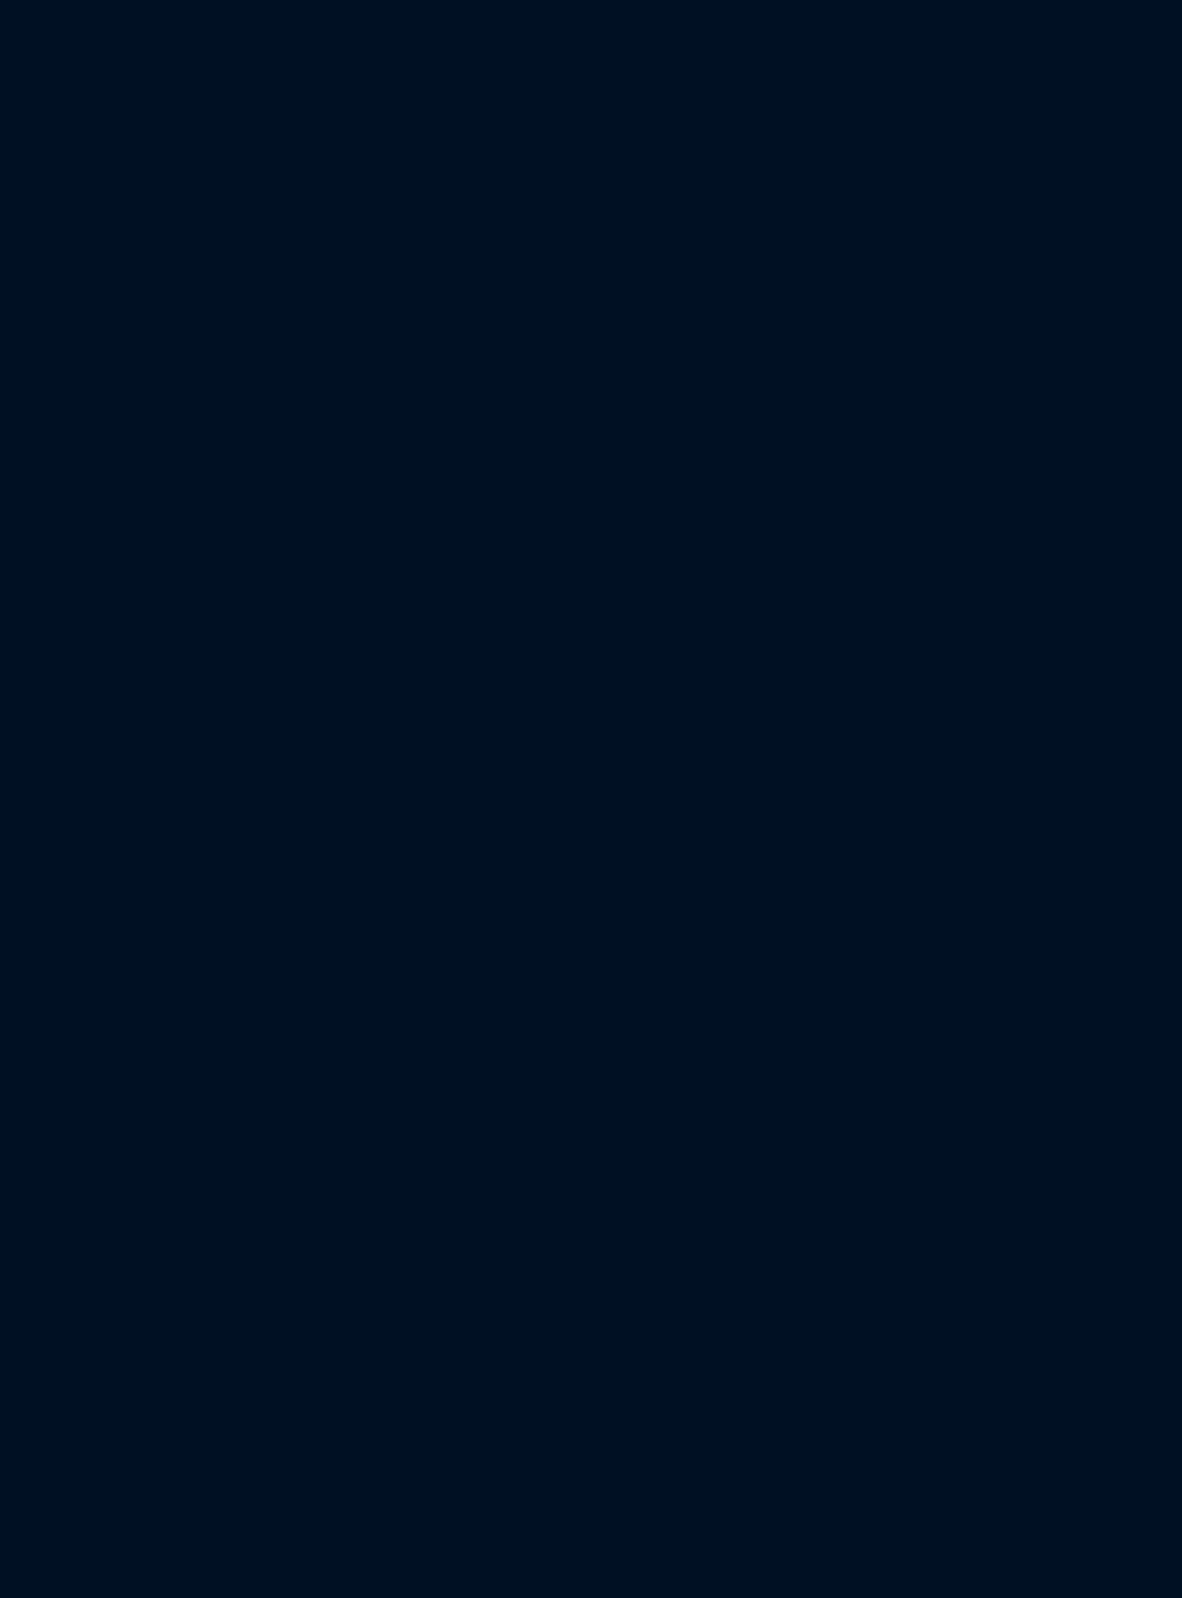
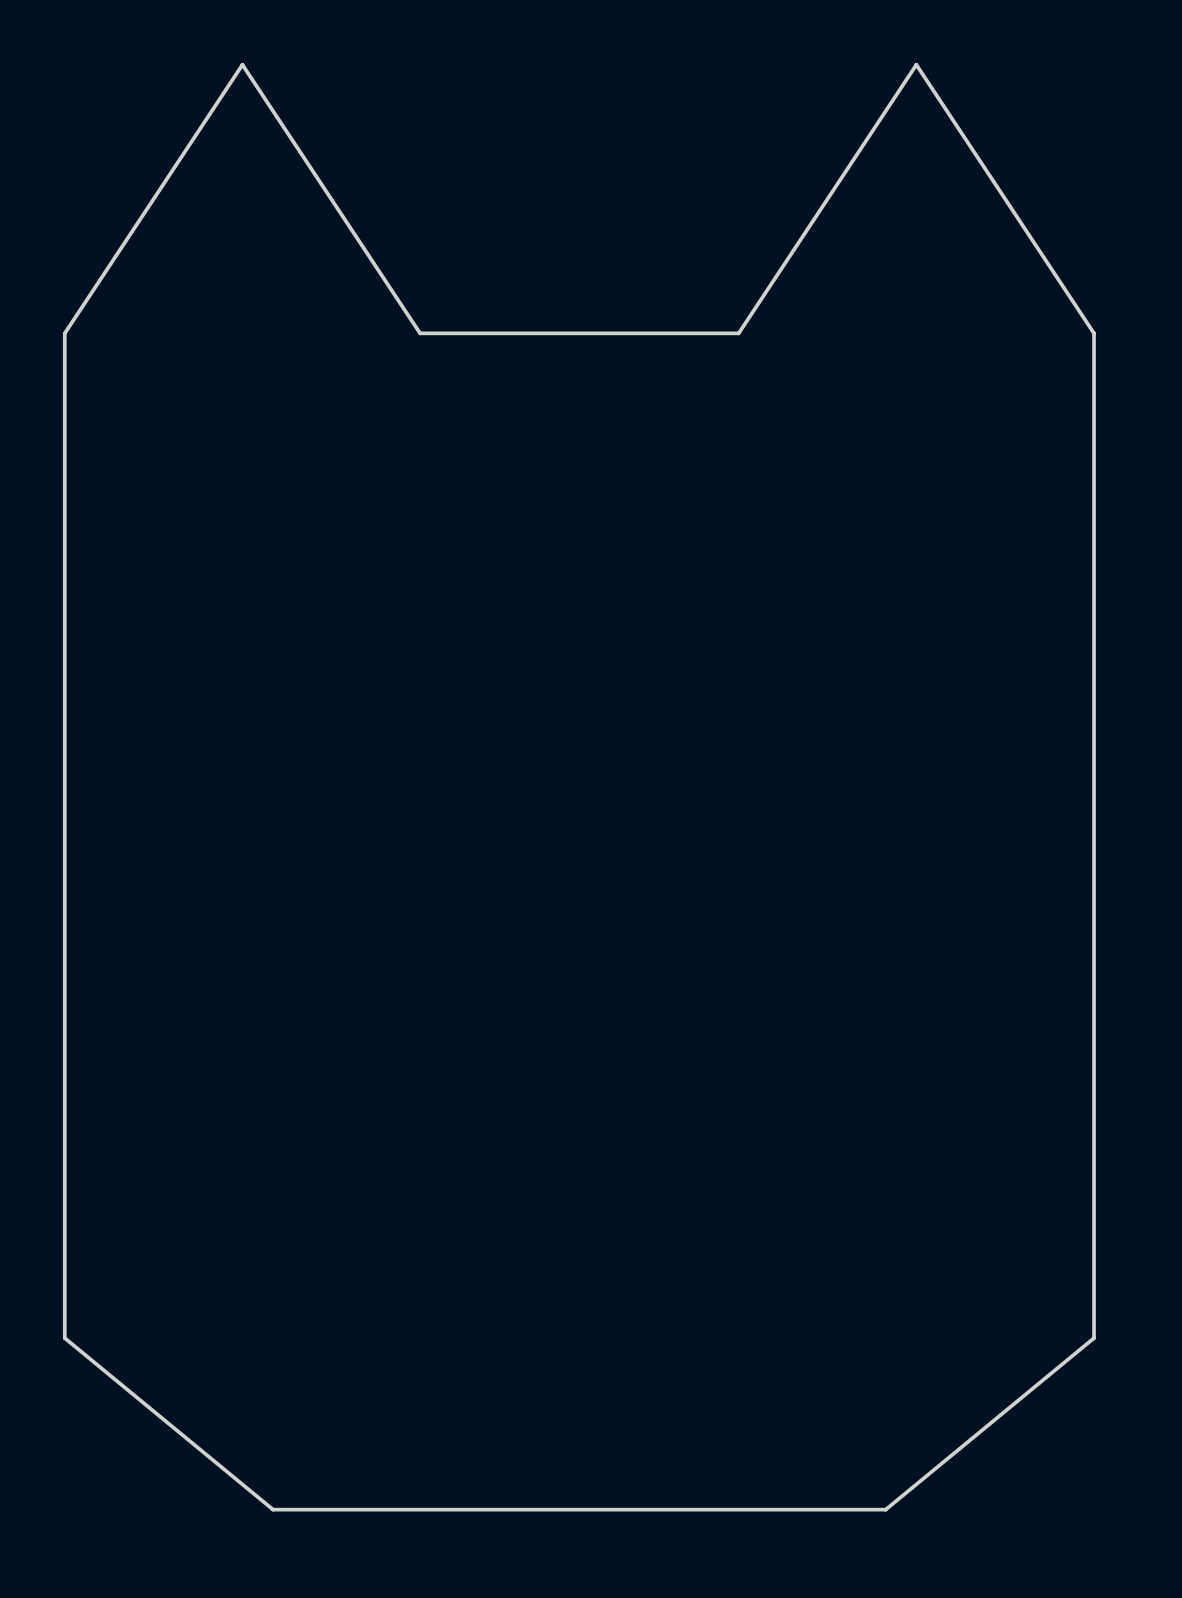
board edge: none -> (242, 64) (64, 333) (64, 1338) (273, 1509) (885, 1509) (1094, 1338) (1094, 333) (916, 64) (738, 333) (420, 333) (242, 64)

